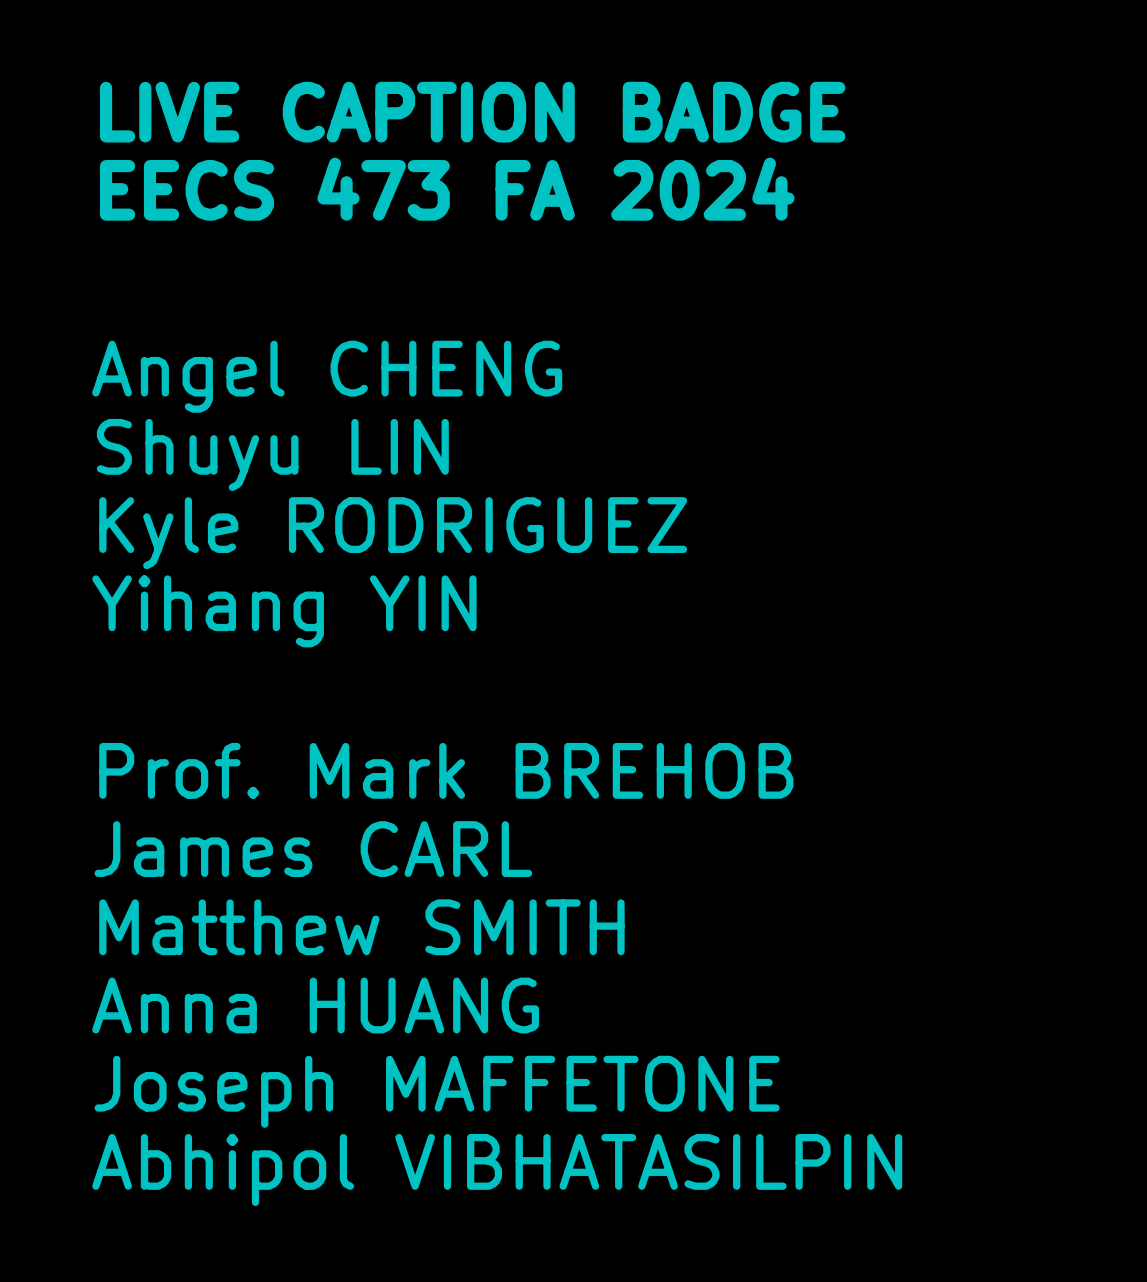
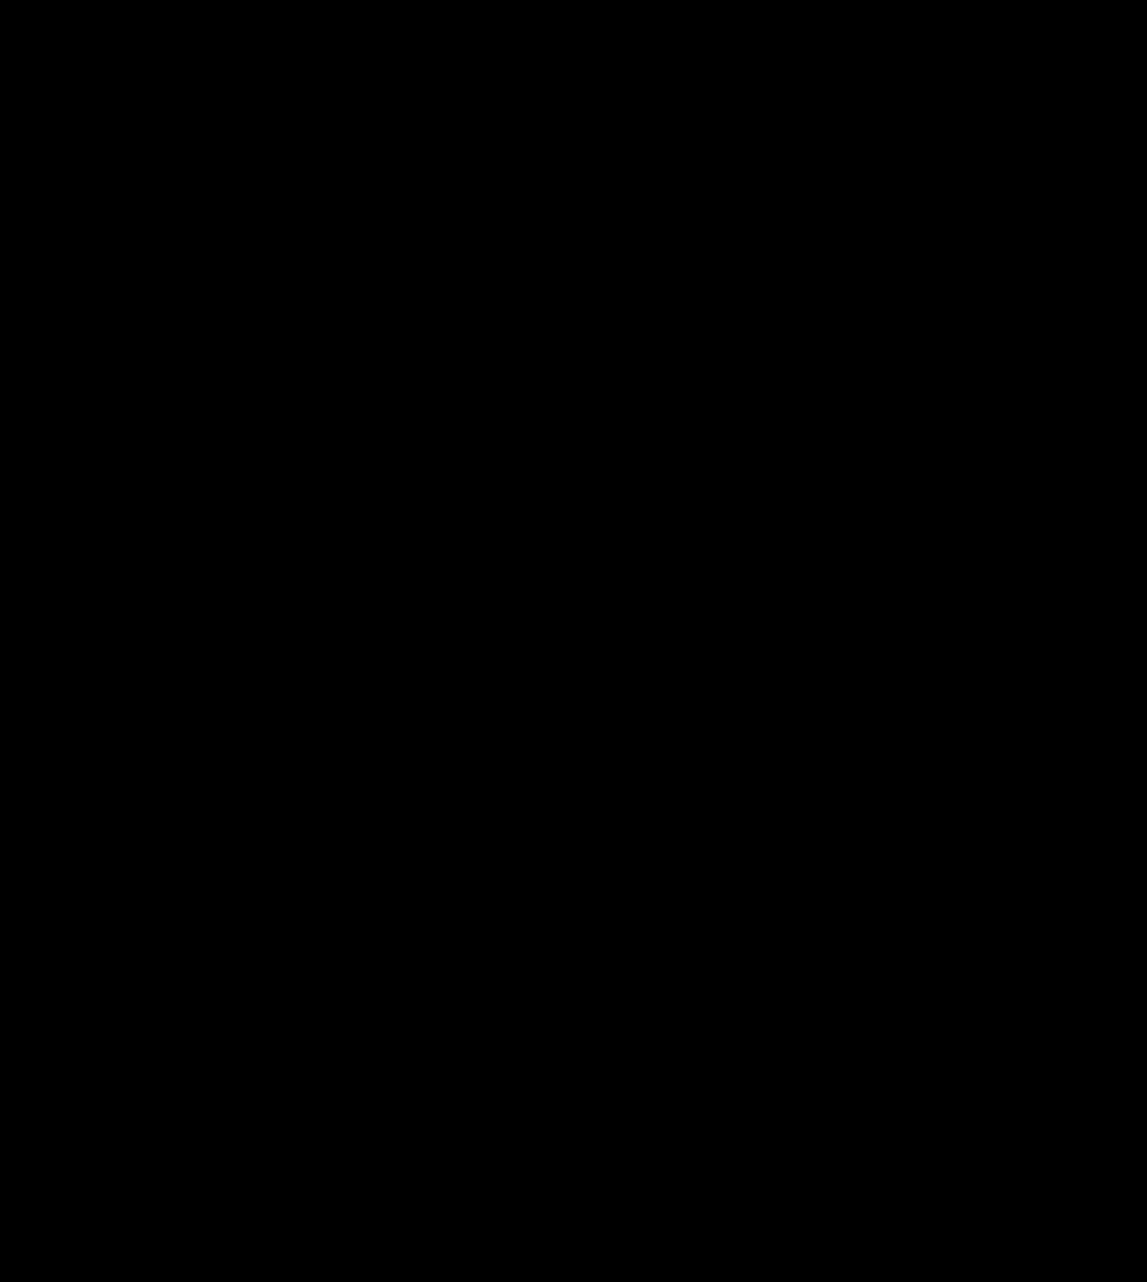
text: LIVE CAPTION BADGE (472, 112) -> none
text: EECS 473 FA 2024 (447, 189) -> none
text: Angel CHENG (327, 376) -> none
text: Shuyu LIN (272, 454) -> none
text: Kyle RODRIGUEZ (393, 533) -> none
text: Yihang YIN (284, 611) -> none
text: Prof. Mark BREHOB (446, 770) -> none
text: James CARL (313, 849) -> none
text: Matthew SMITH (361, 927) -> none
text: Anna HUANG (315, 1005) -> none
text: Joseph MAFFETONE (437, 1091) -> none
text: Abhipol VIBHATASILPIN (497, 1170) -> none

